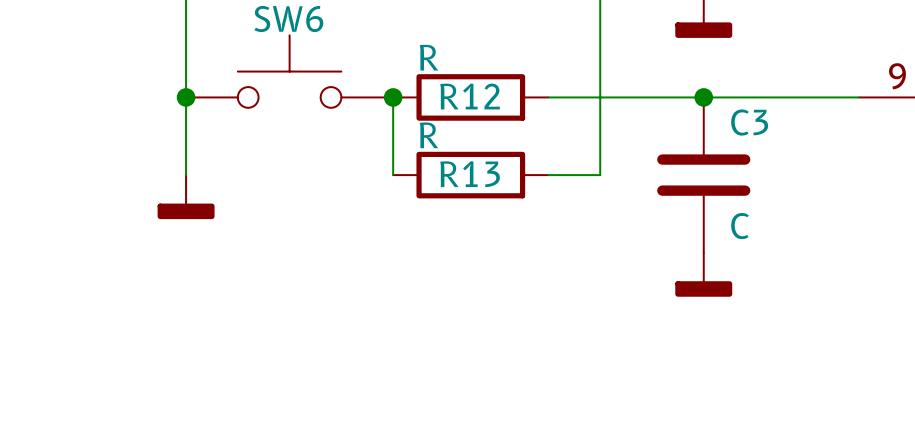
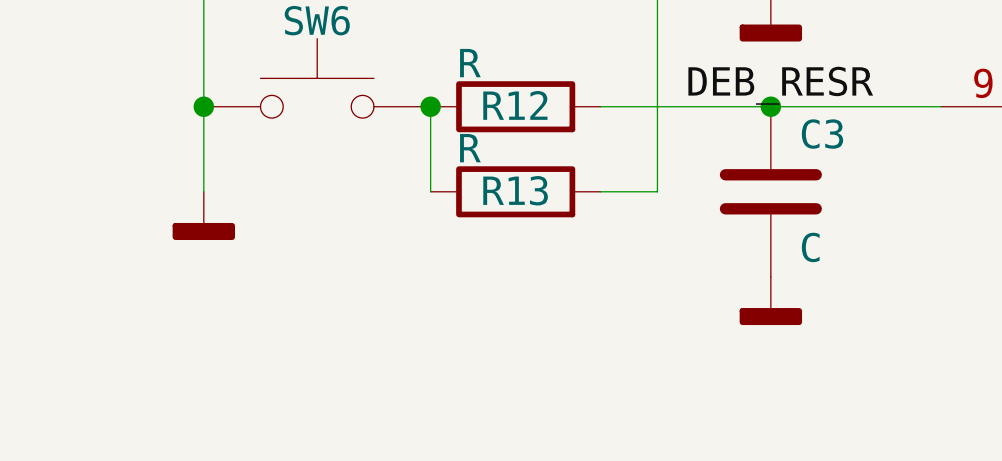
label: none -> DEB_RESR (780, 85)

